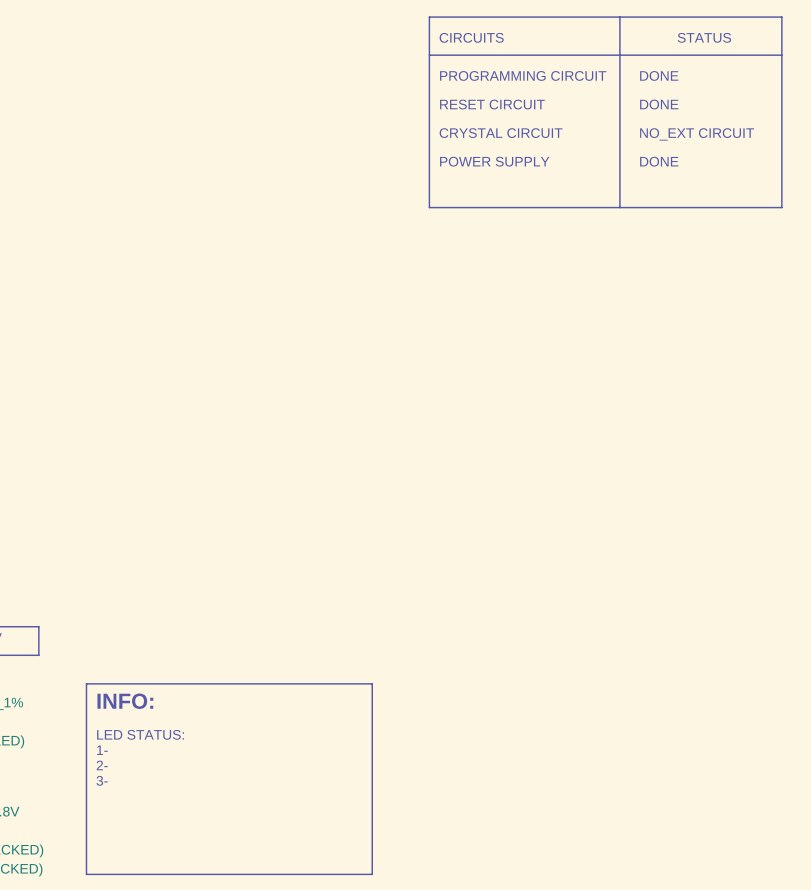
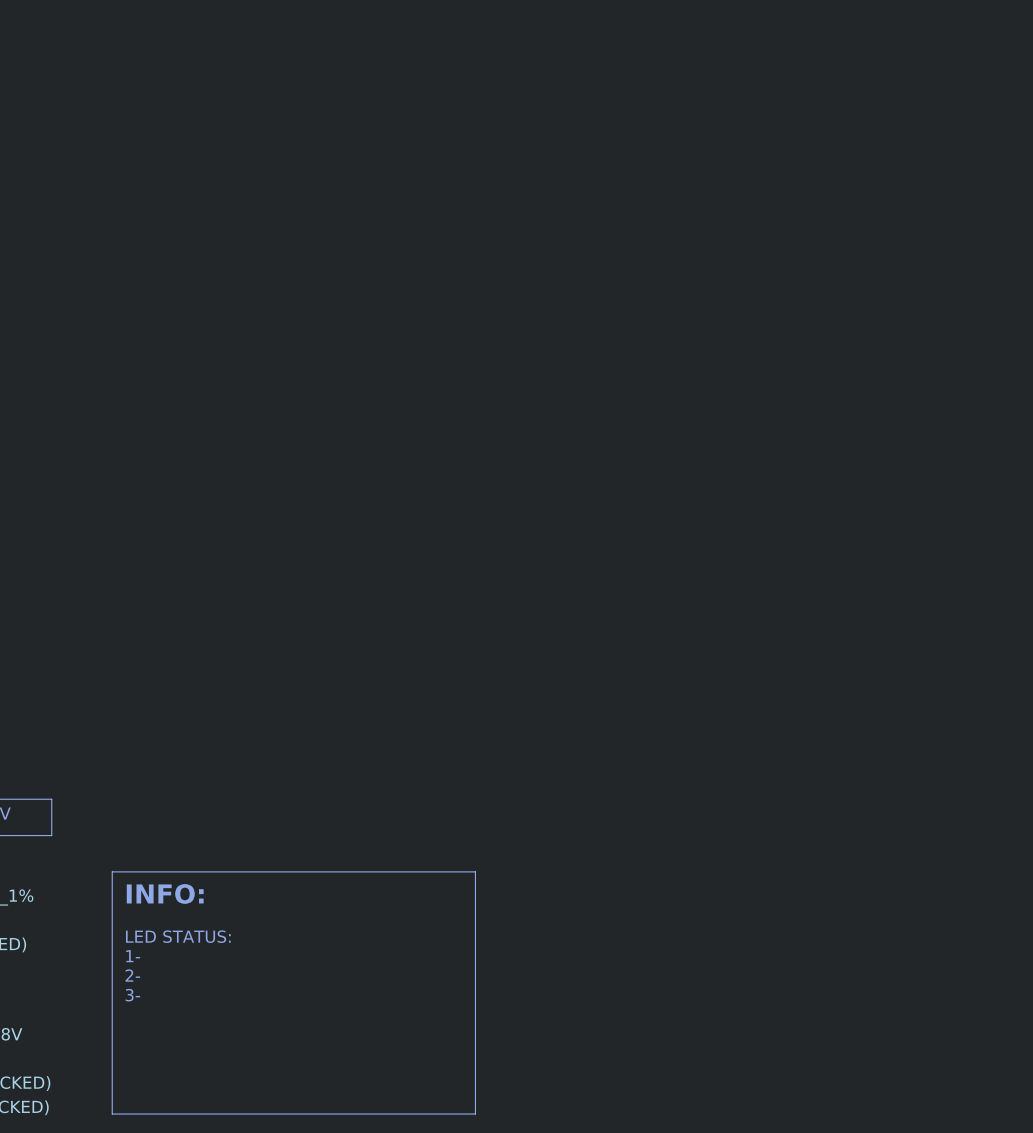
line: (429, 17) (781, 17) (781, 207) (429, 207) (429, 17) -> none
line: (619, 17) (619, 207) -> none
text: CIRCUITS (471, 37) -> none
text: STATUS (704, 37) -> none
line: (429, 55) (781, 55) -> none
text: PROGRAMMING CIRCUIT (523, 75) -> none
text: DONE (659, 75) -> none
text: RESET CIRCUIT (492, 104) -> none
text: DONE (659, 104) -> none
text: CRYSTAL CIRCUIT (501, 133) -> none
text: NO_EXT CIRCUIT (697, 134) -> none
text: POWER SUPPLY (494, 161) -> none
text: DONE (659, 161) -> none

